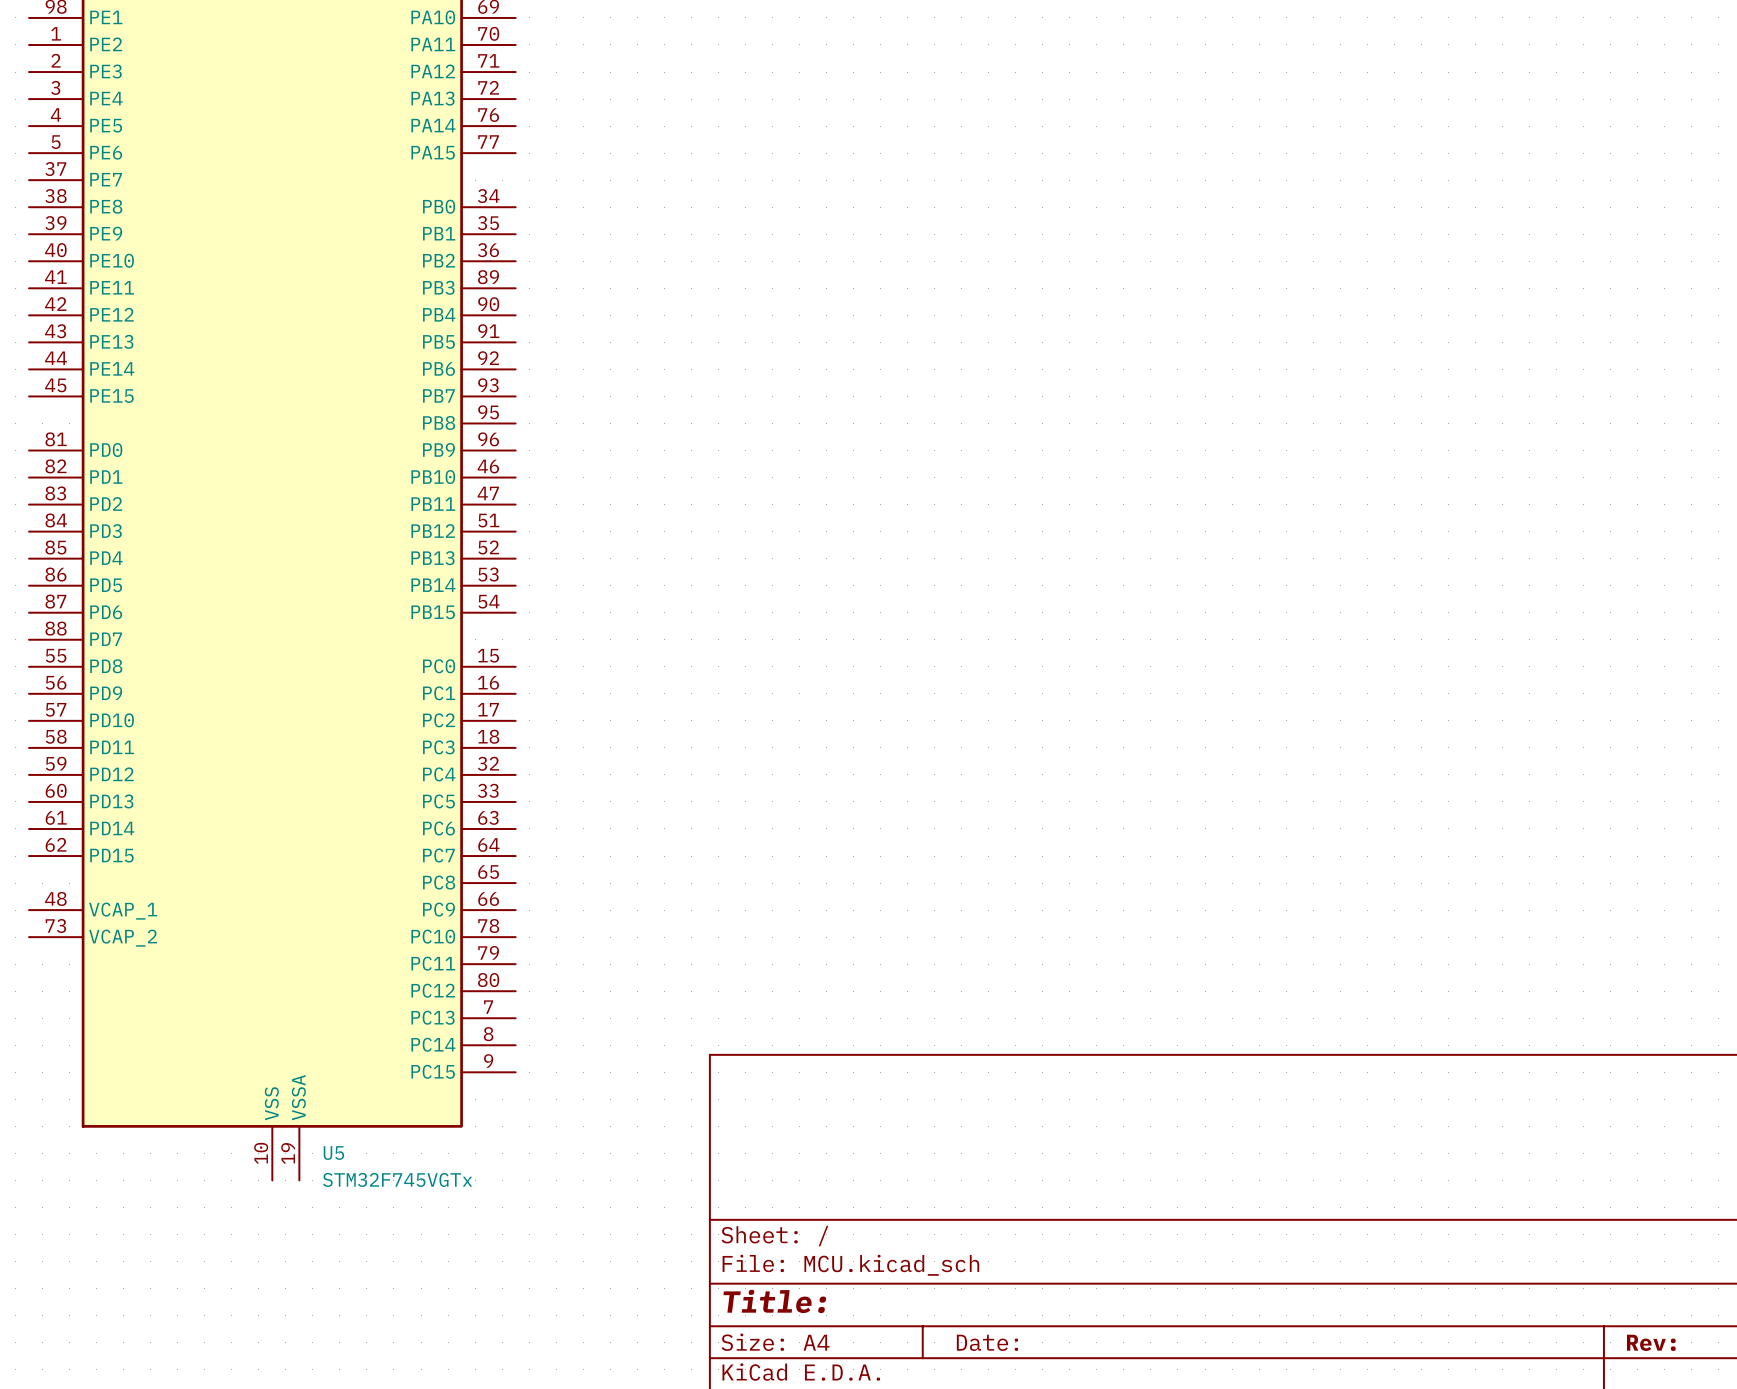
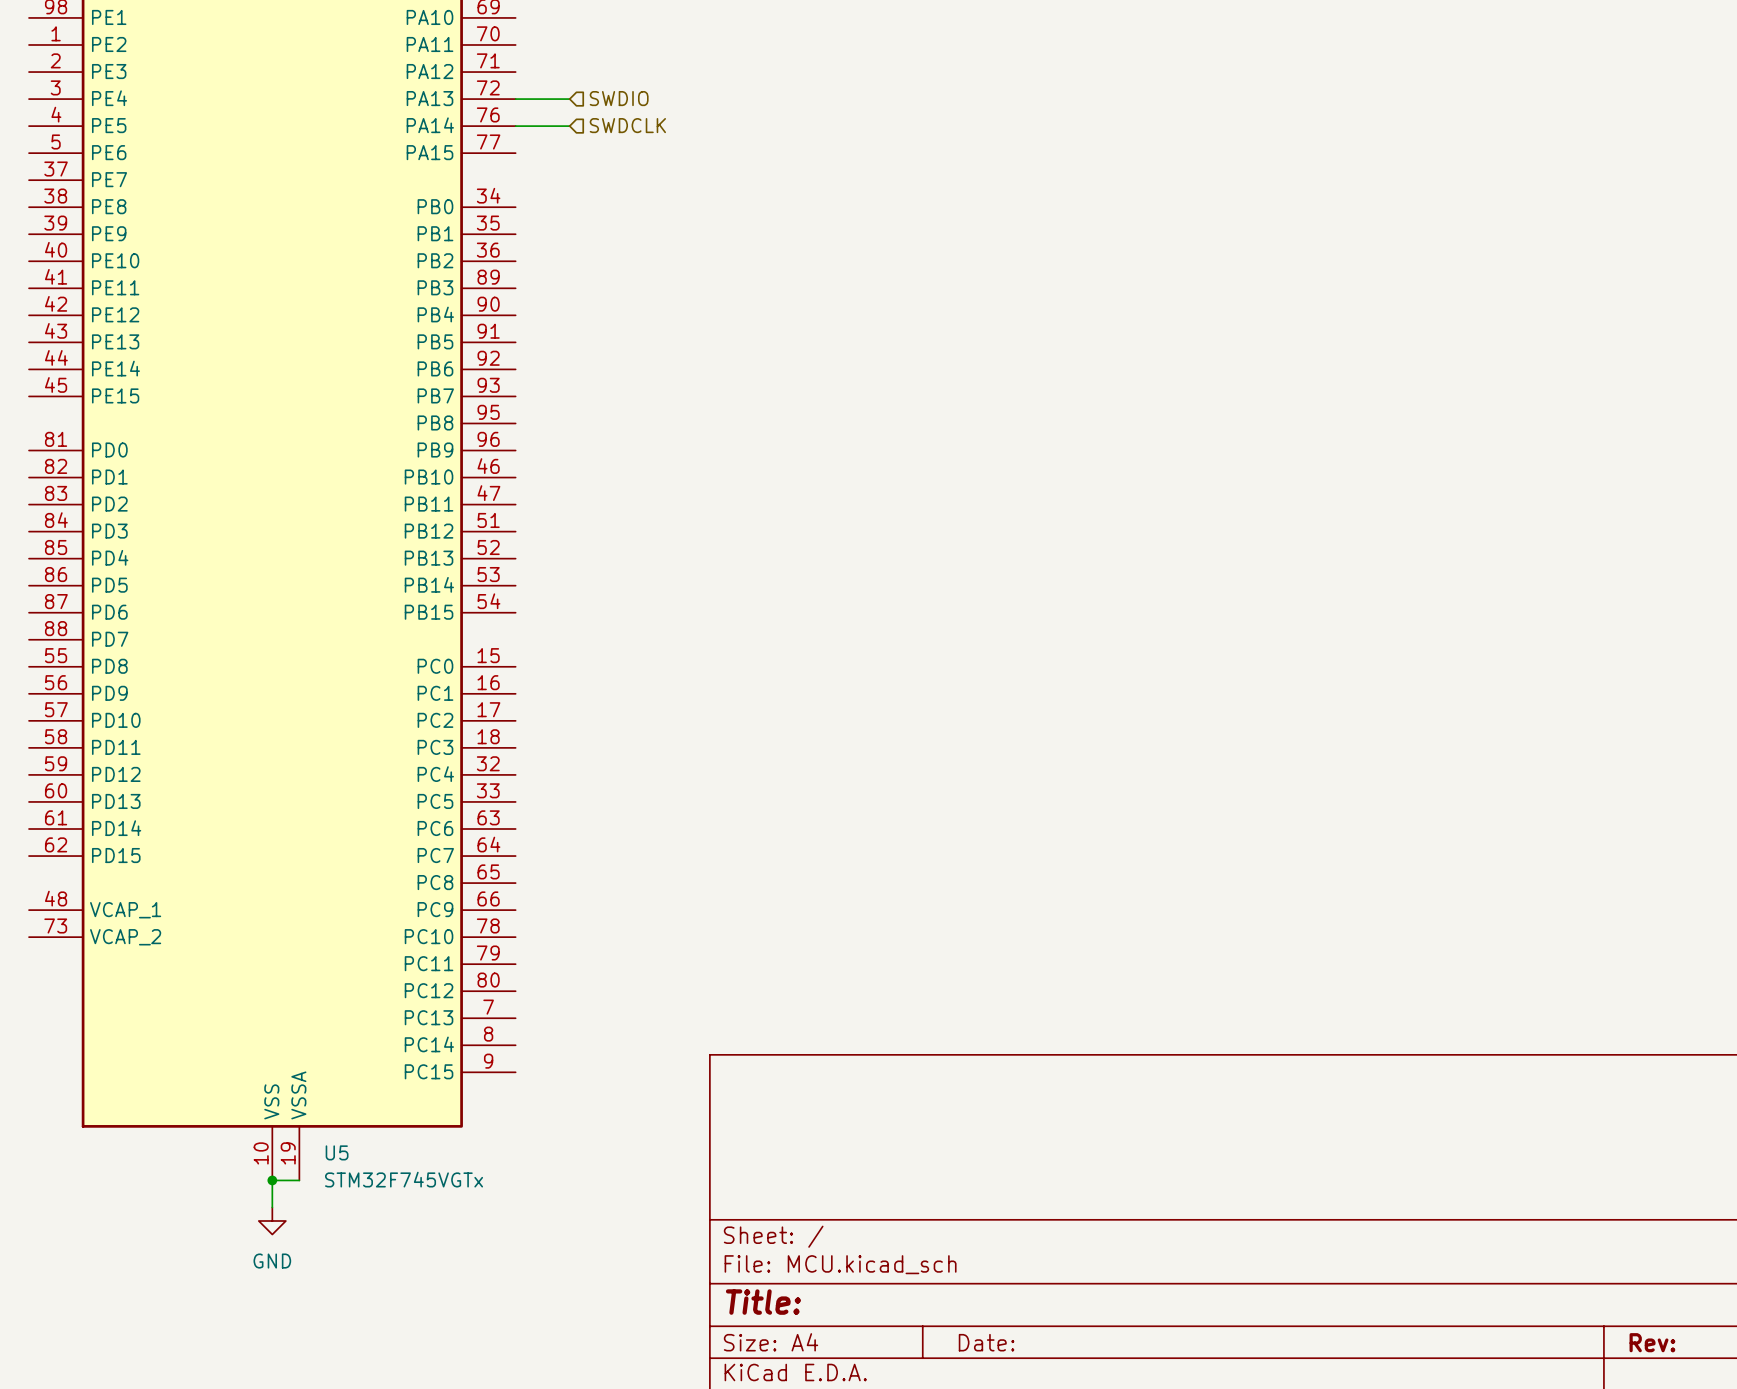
hierarchical label: none -> SWDIO (619, 98)
wire: none -> (515, 99) (569, 99)
hierarchical label: none -> SWDCLK (627, 125)
wire: none -> (515, 126) (569, 126)
junction: none -> (272, 1180)
wire: none -> (299, 1180) (272, 1180) (272, 1207)
power symbol: none -> GND (272, 1221)

